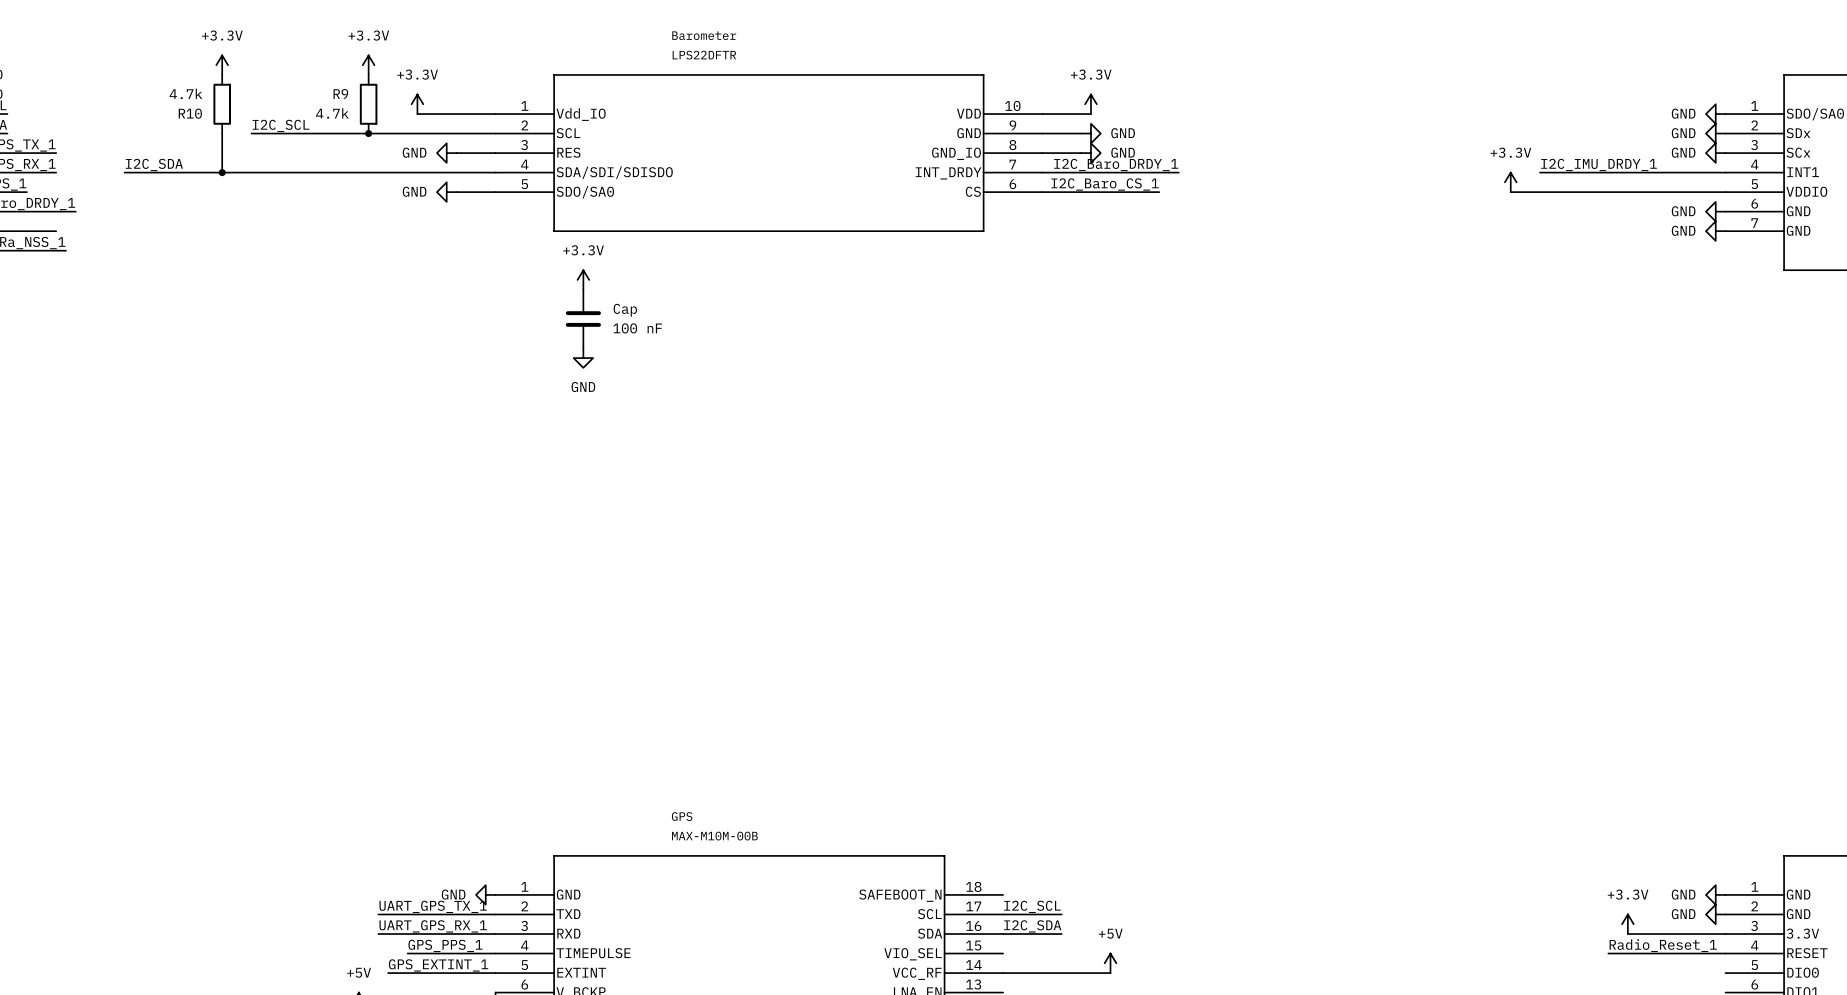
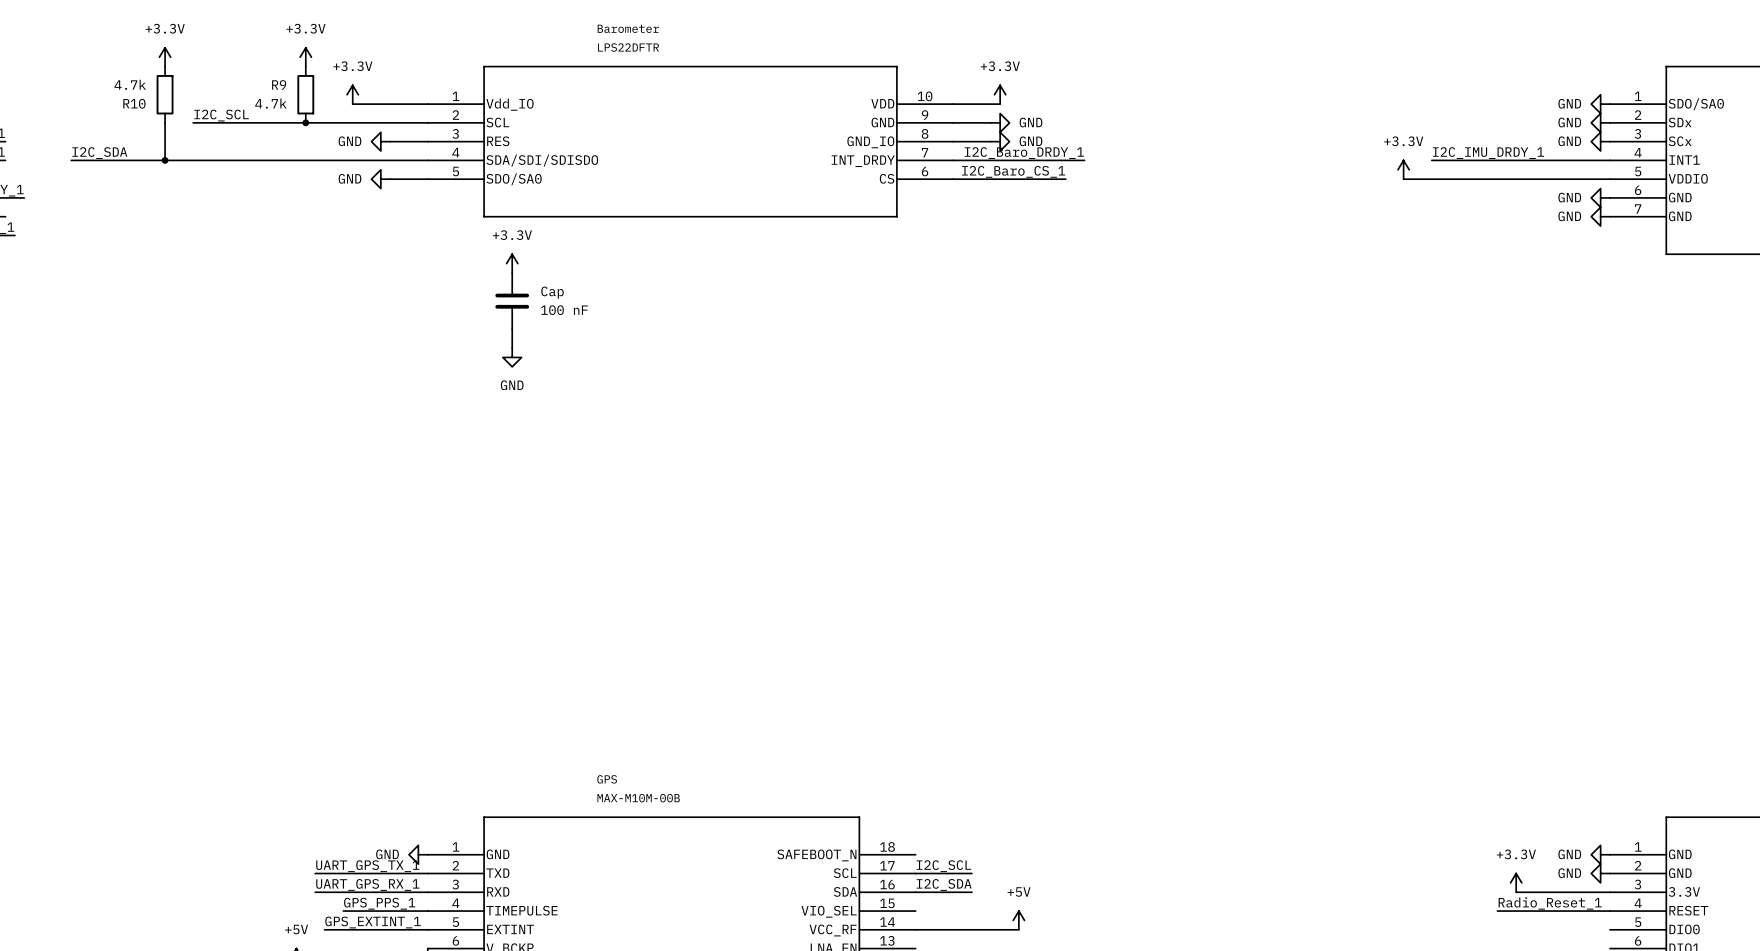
power symbol position: GND (583, 358) -> GND (512, 357)

